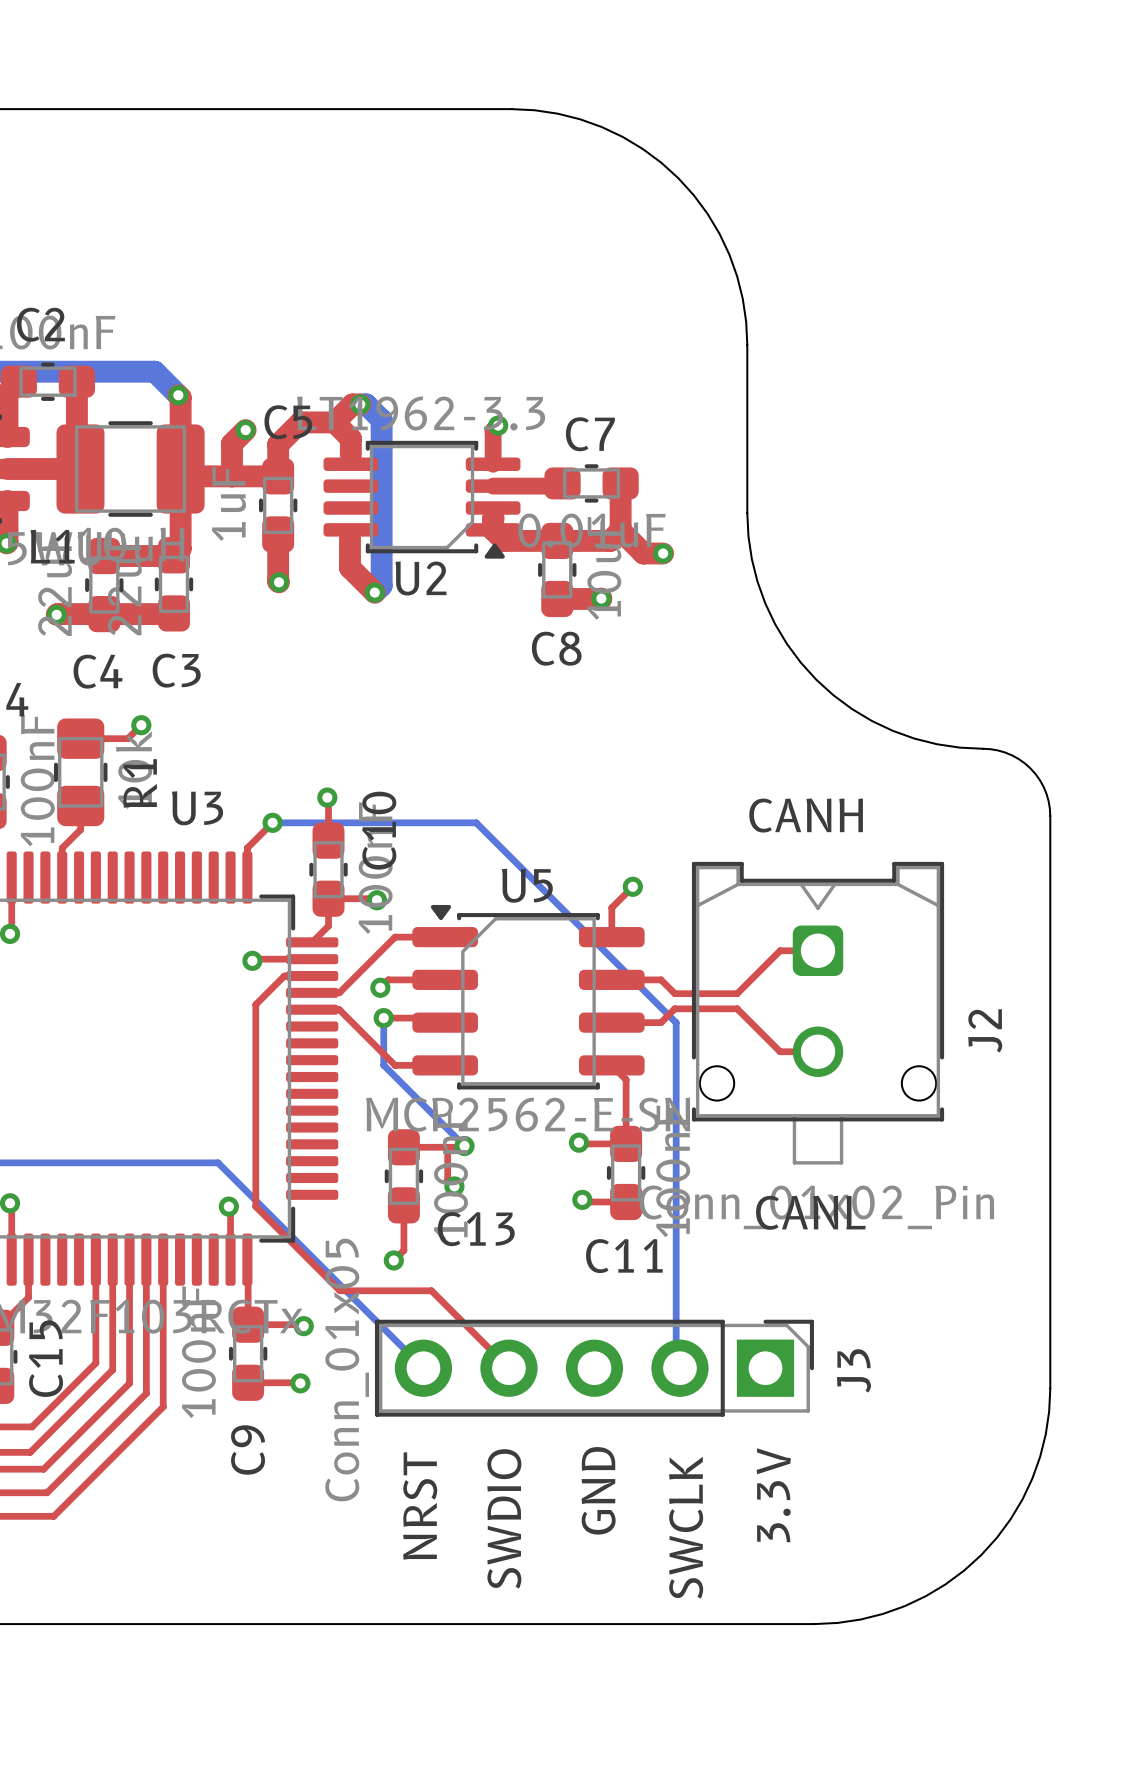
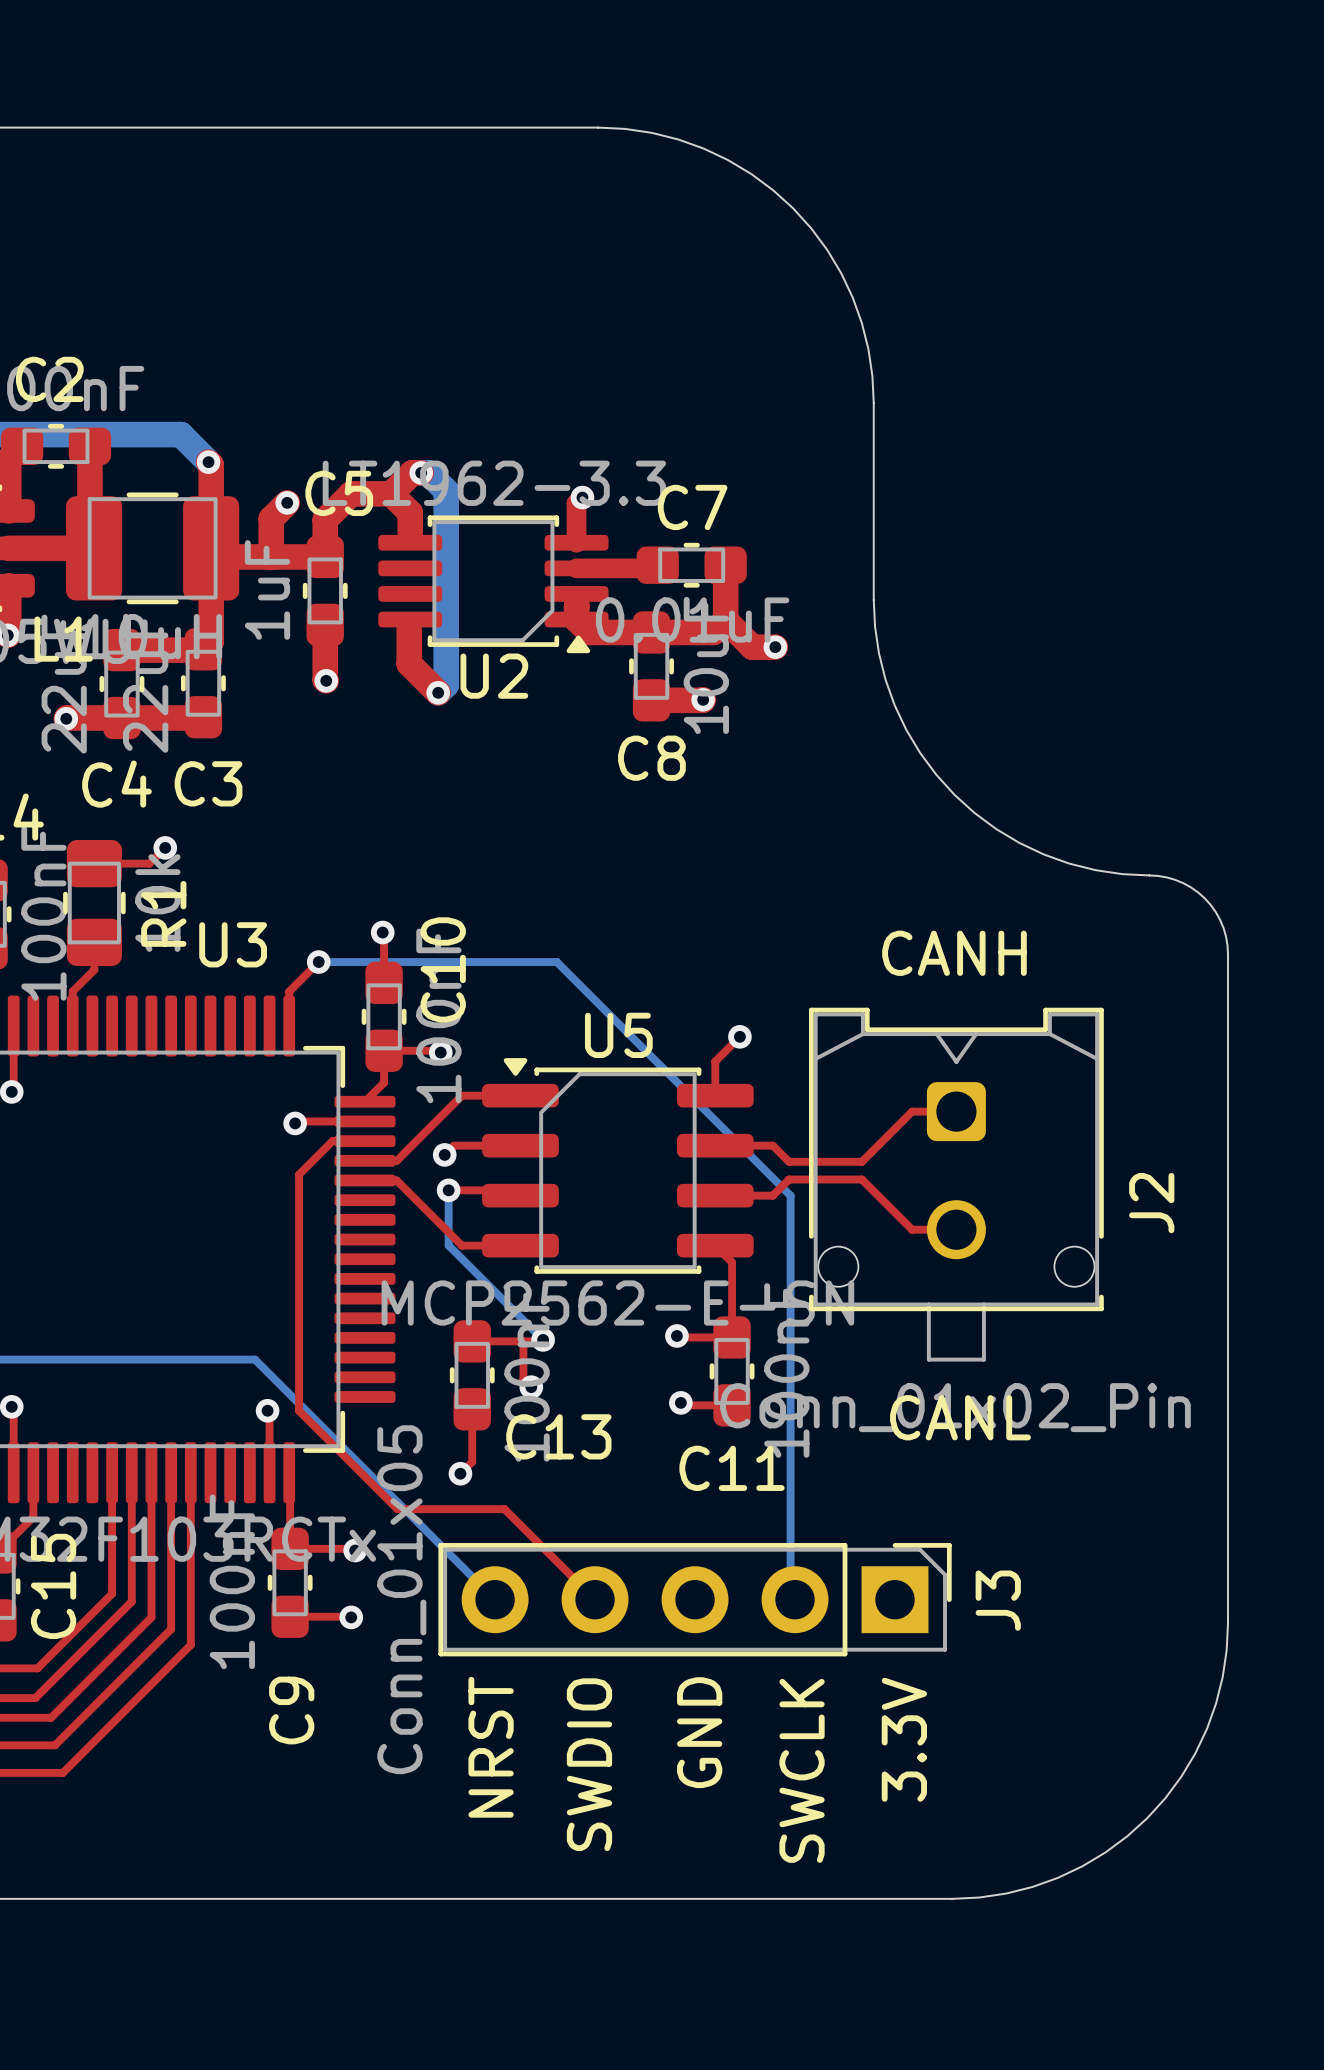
C9 name position: C9 (248, 1449) -> C9 (291, 1710)

